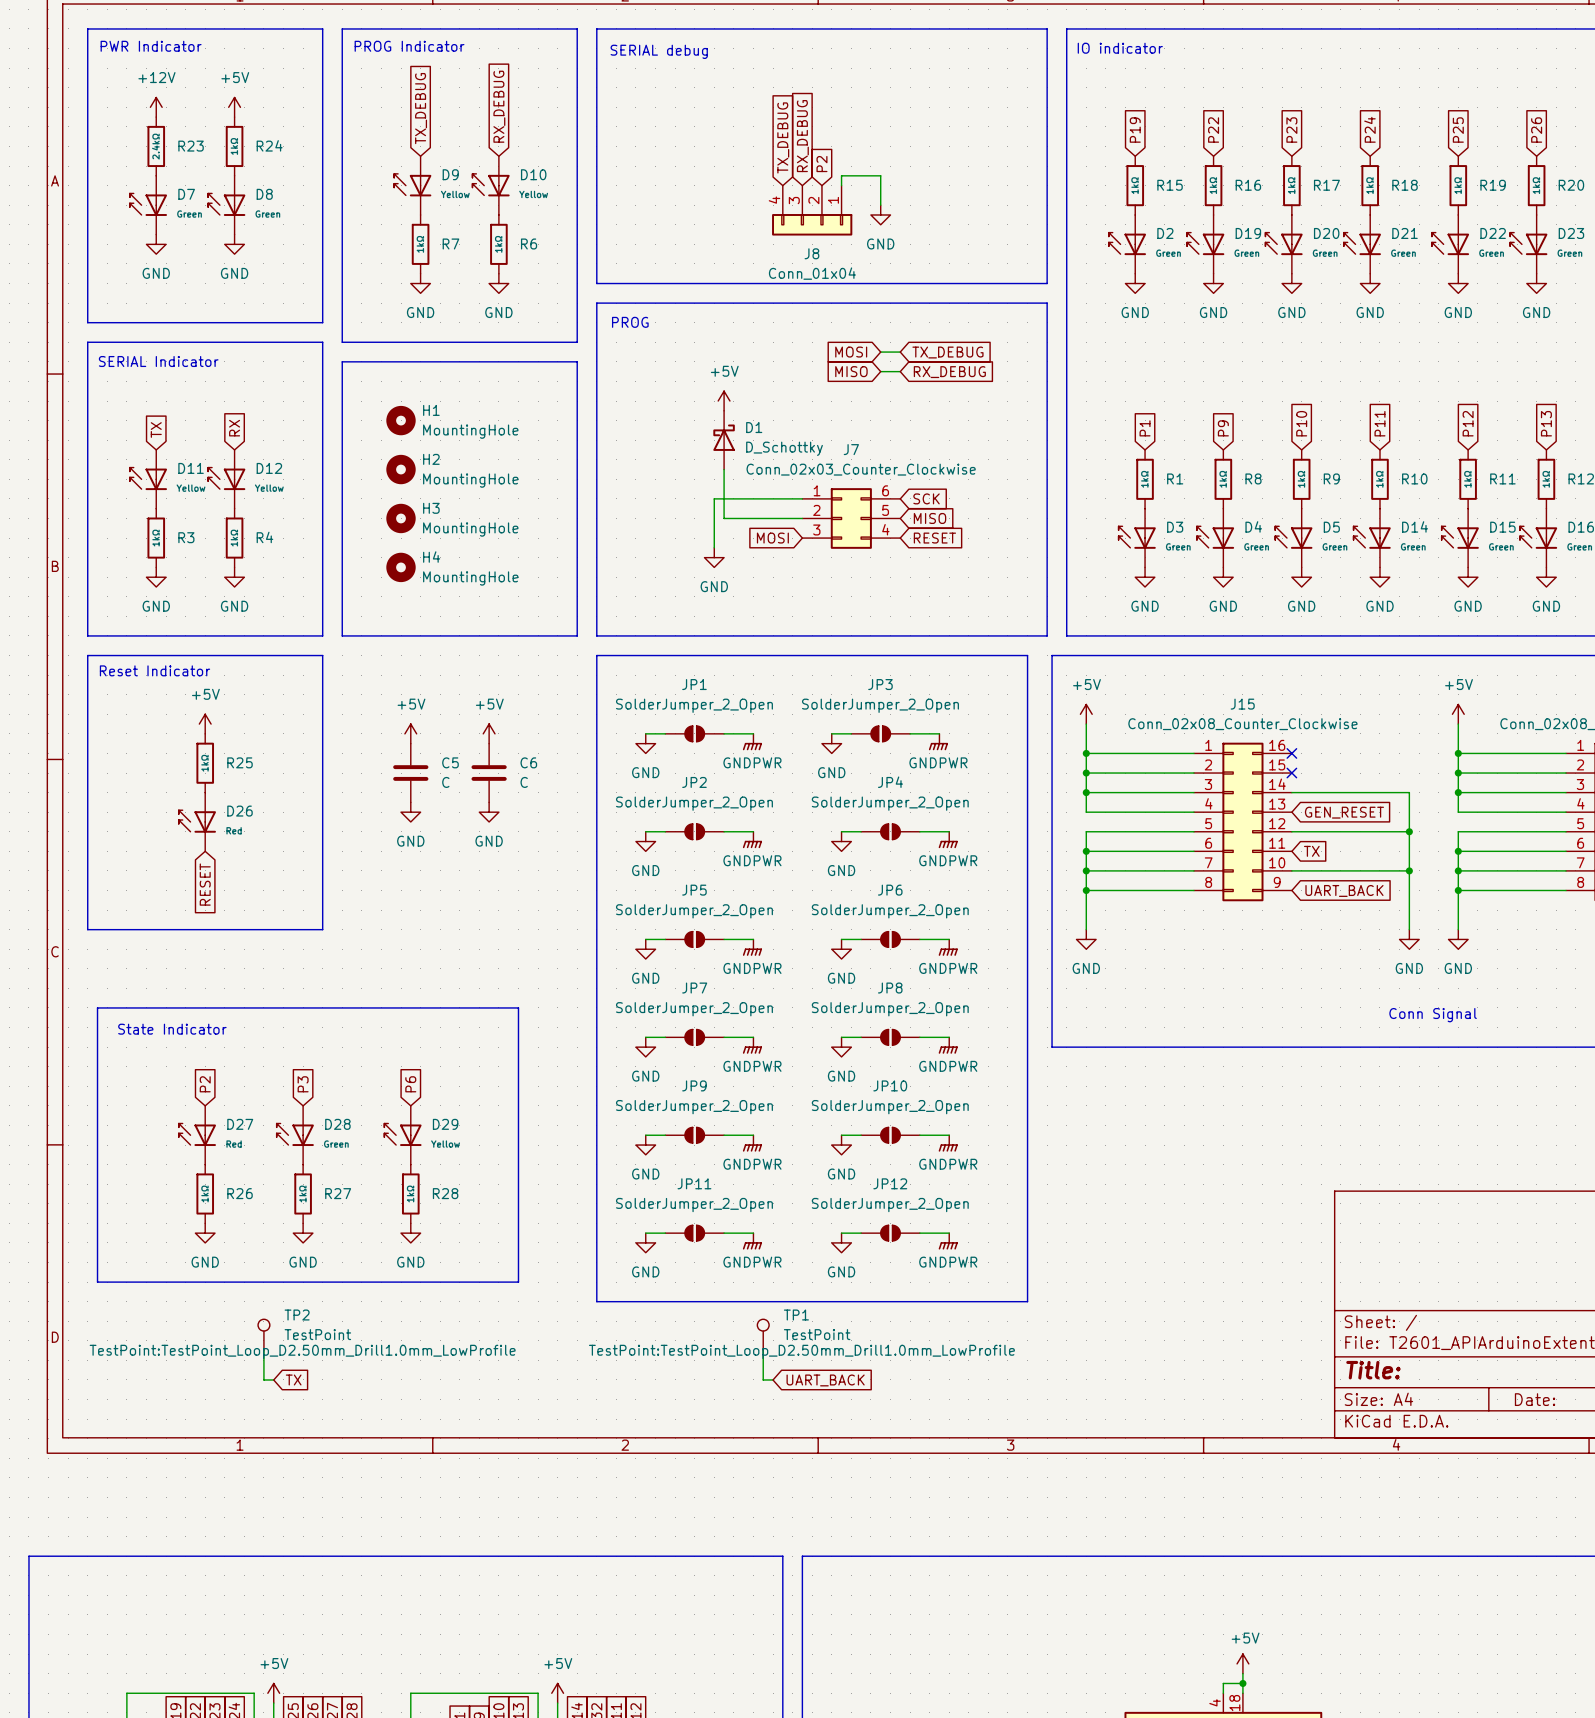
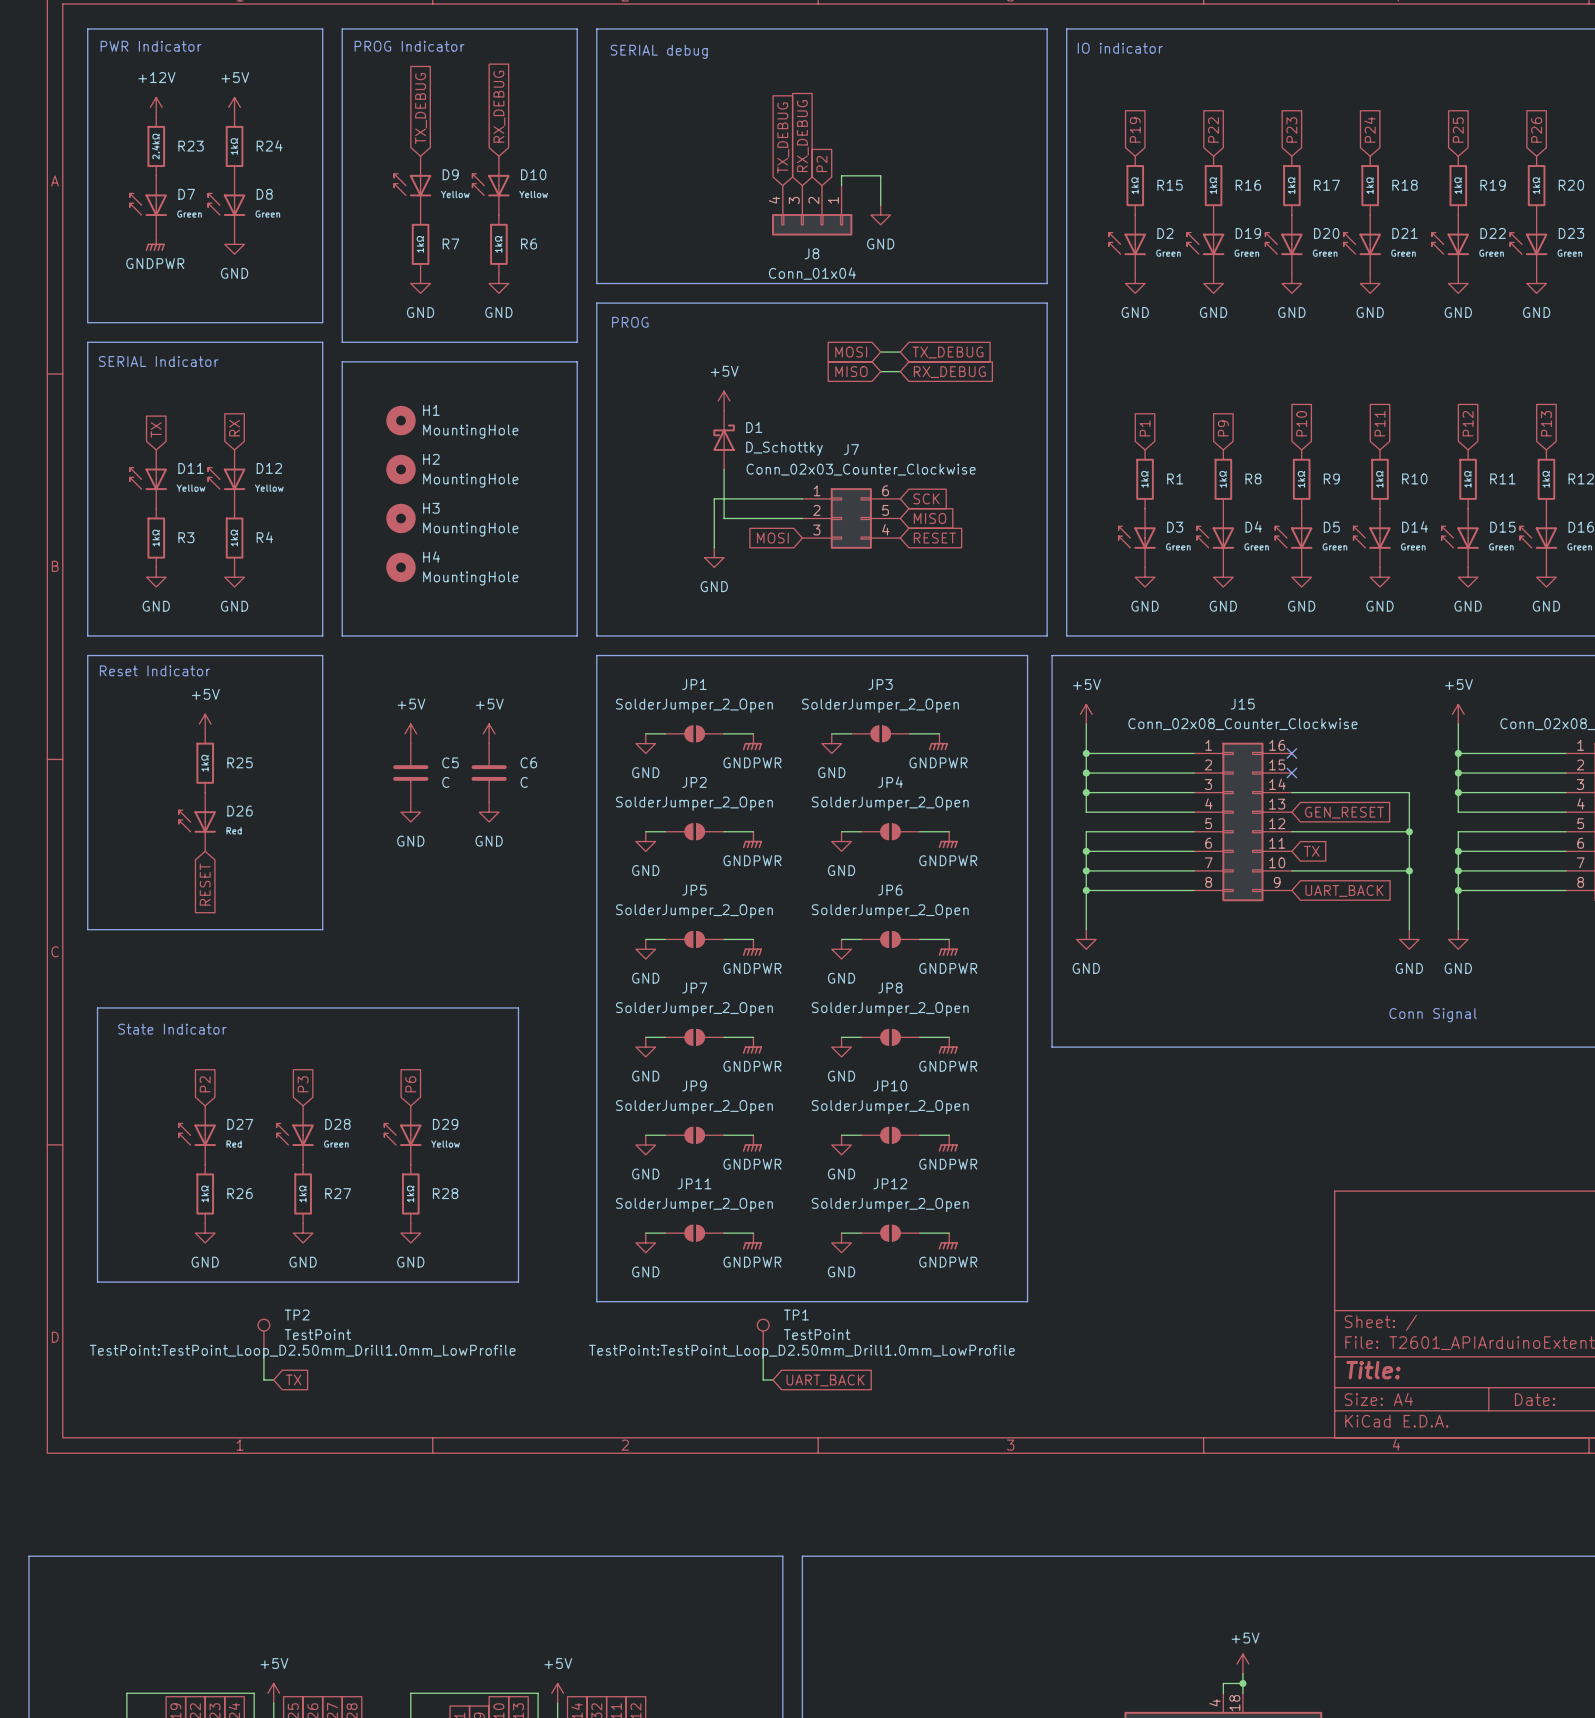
power symbol: GND (156, 244) -> GNDPWR (155, 242)

